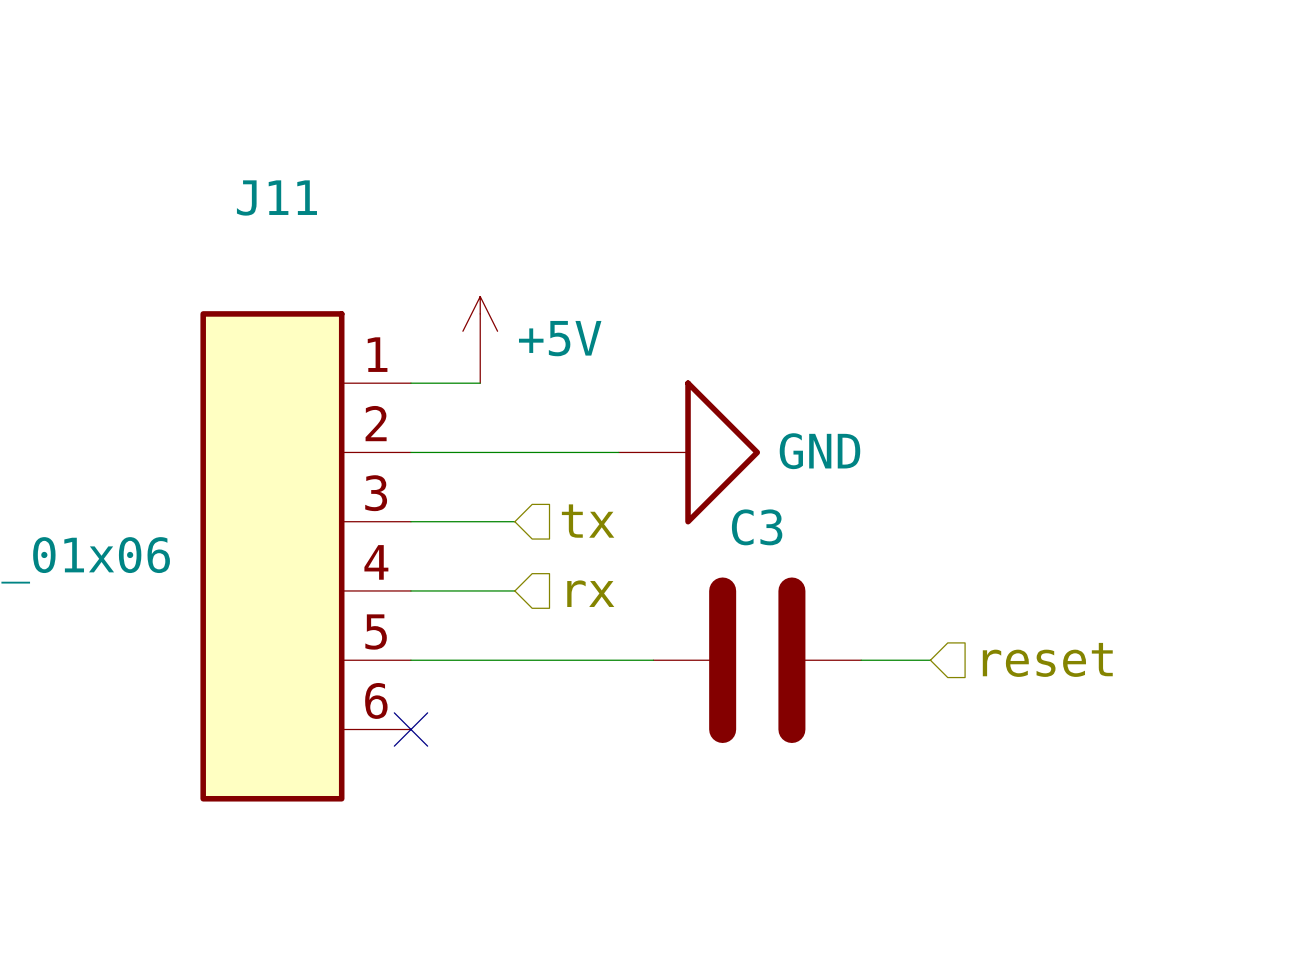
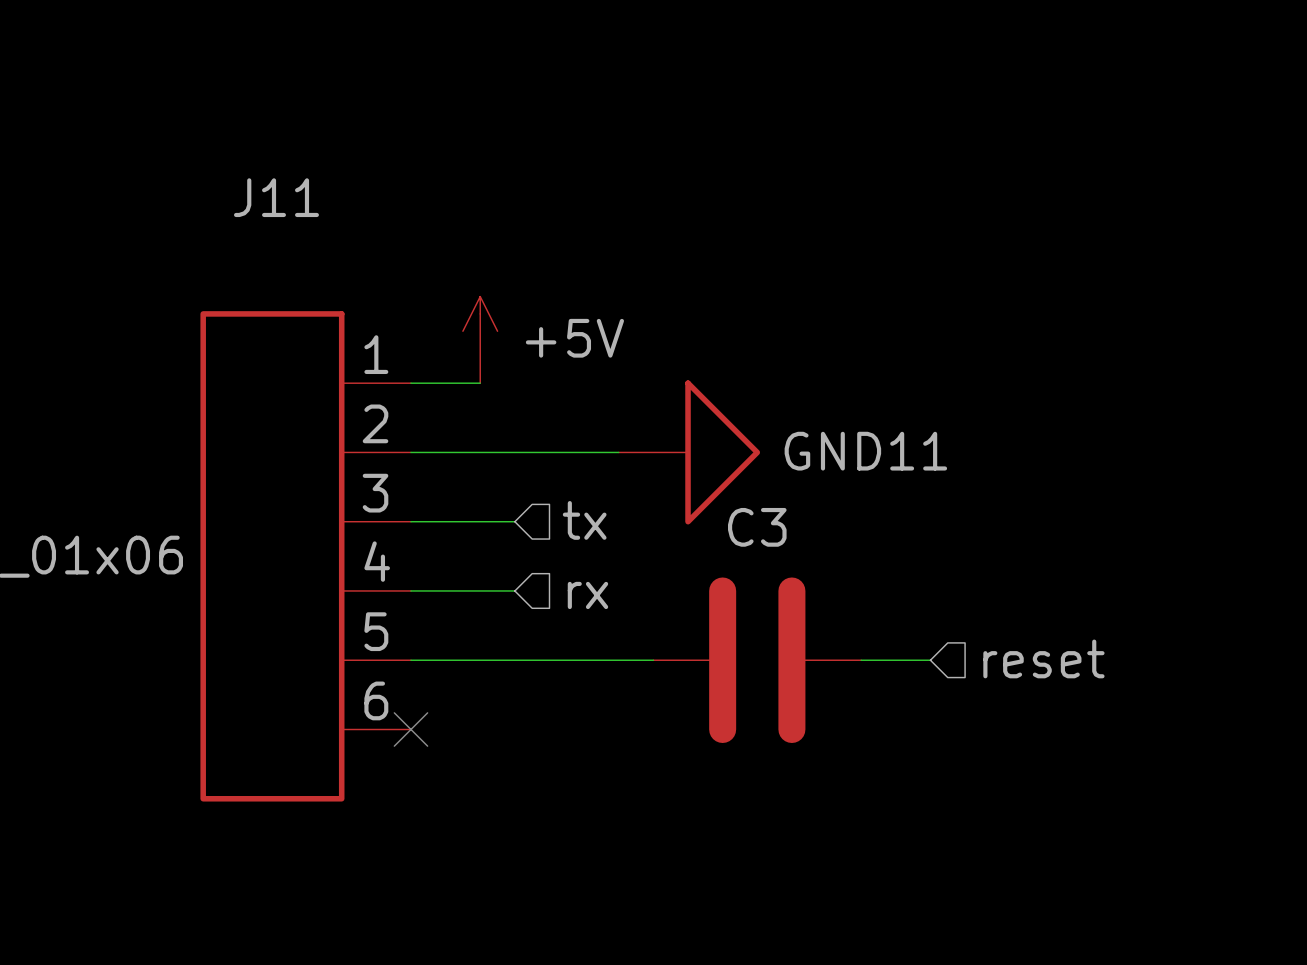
GND name: GND (819, 451) -> GND11 (865, 451)

